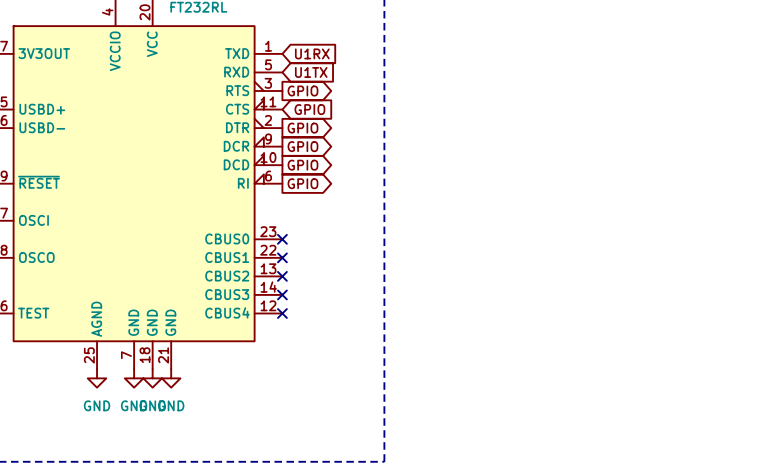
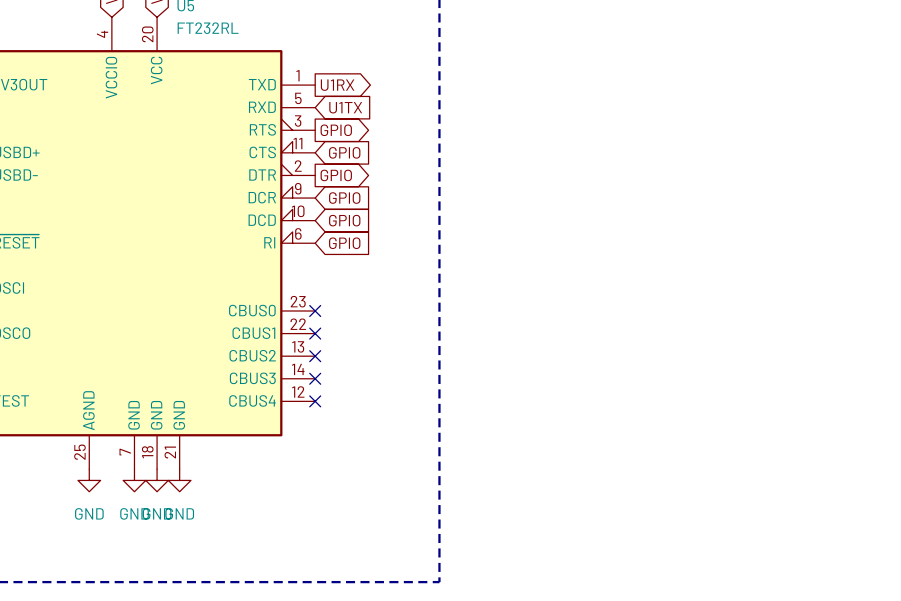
global label shape: input (312, 53) -> output (337, 85)
global label shape: output (302, 146) -> input (344, 198)
global label shape: output (302, 165) -> input (344, 220)
global label shape: output (302, 183) -> input (344, 243)

